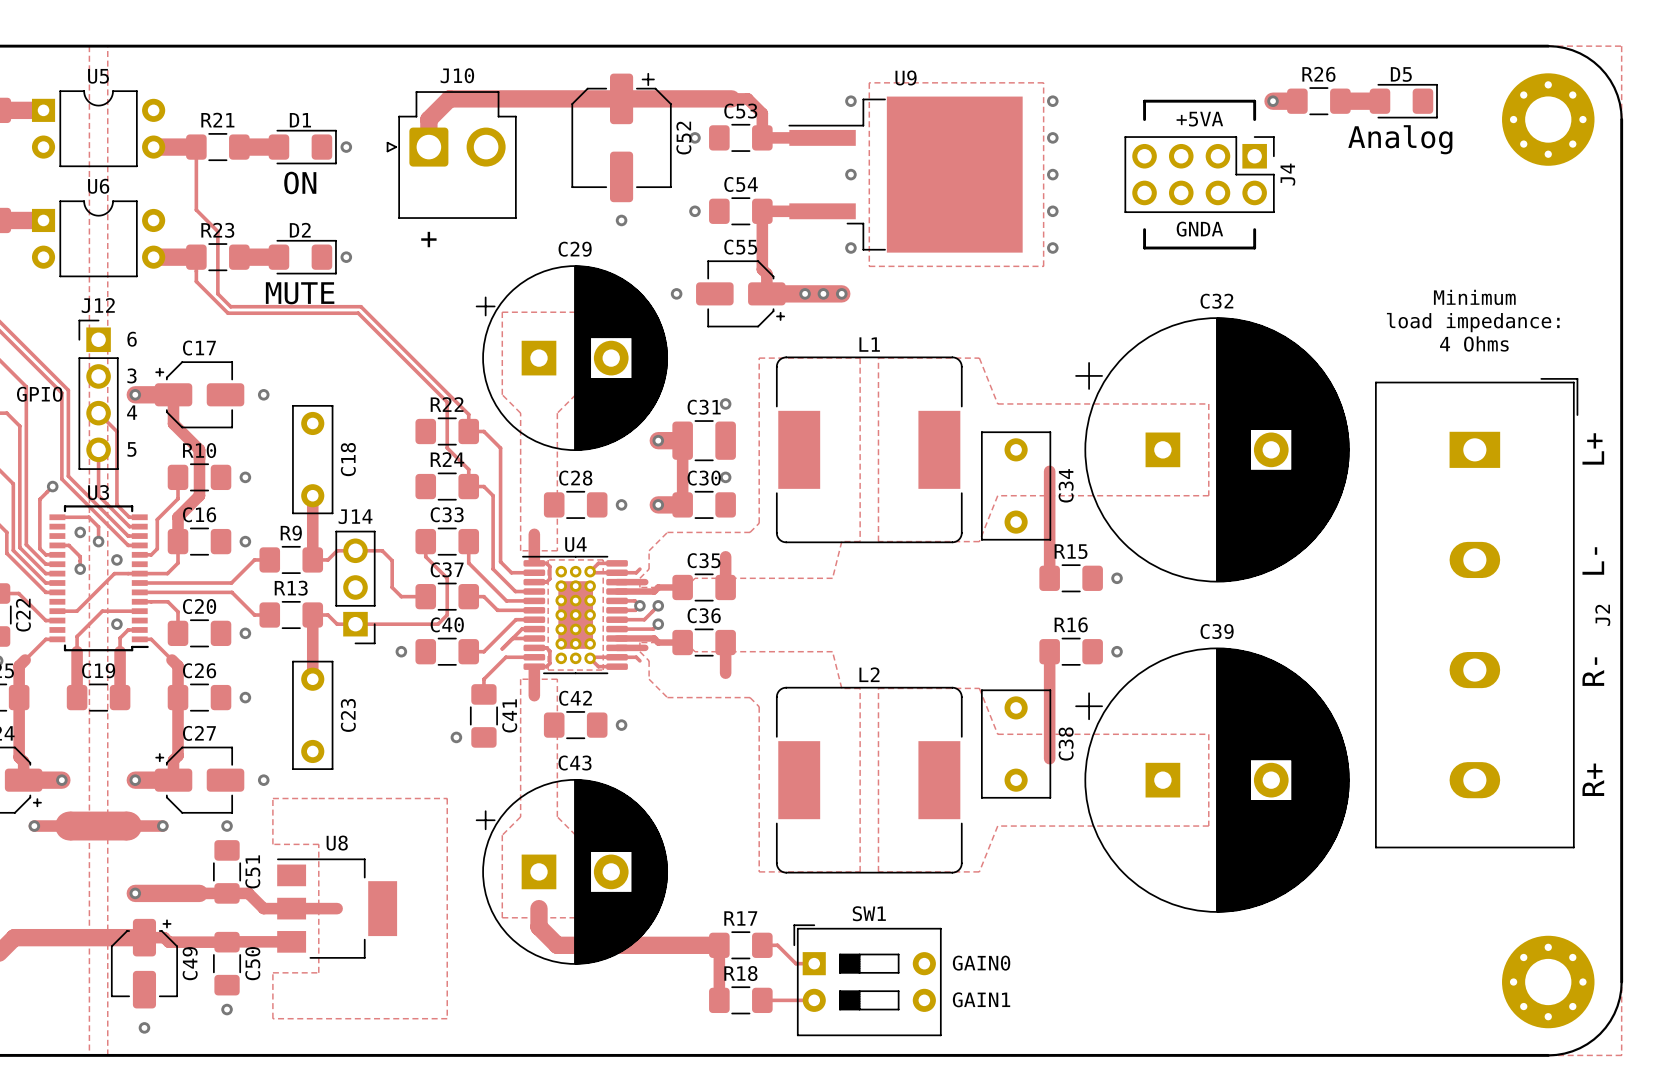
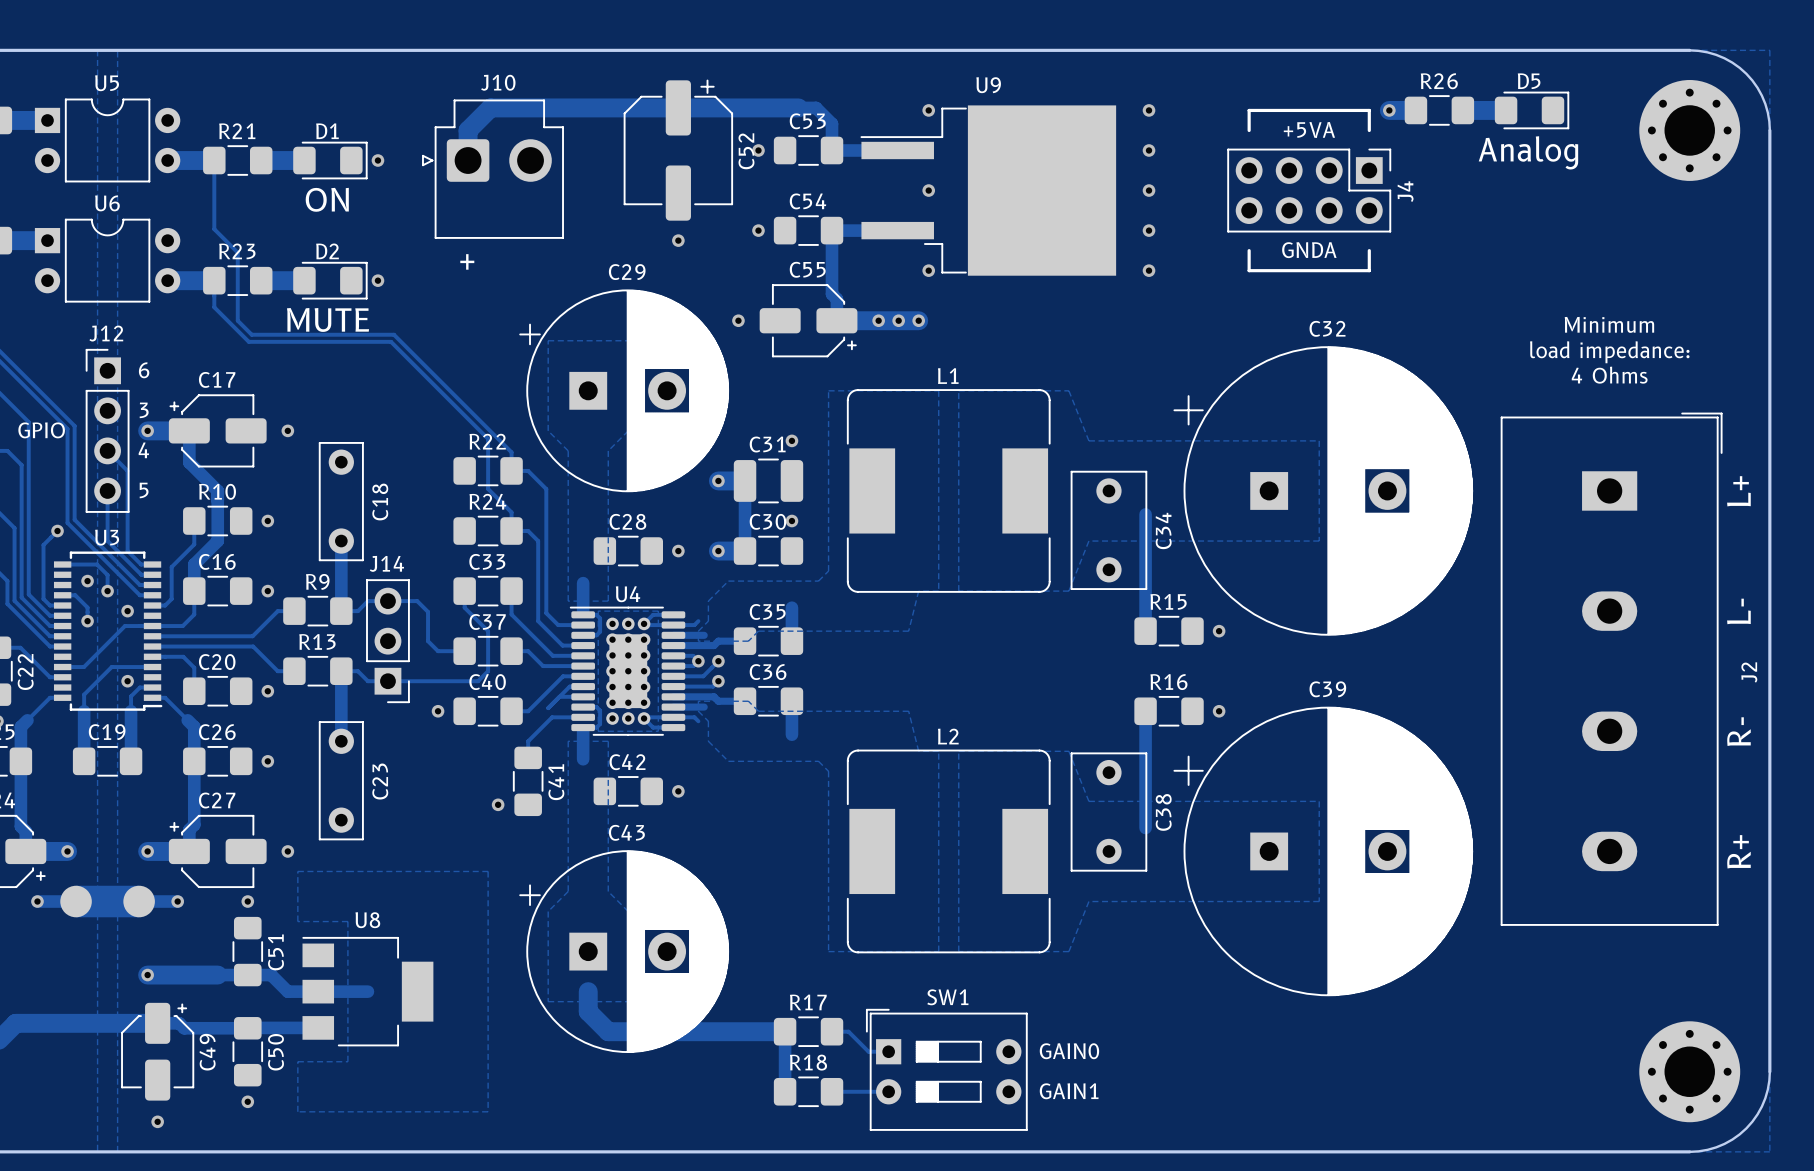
zone outline: (869, 82) (1043, 82) (1043, 266) (869, 266) (869, 82) -> none

